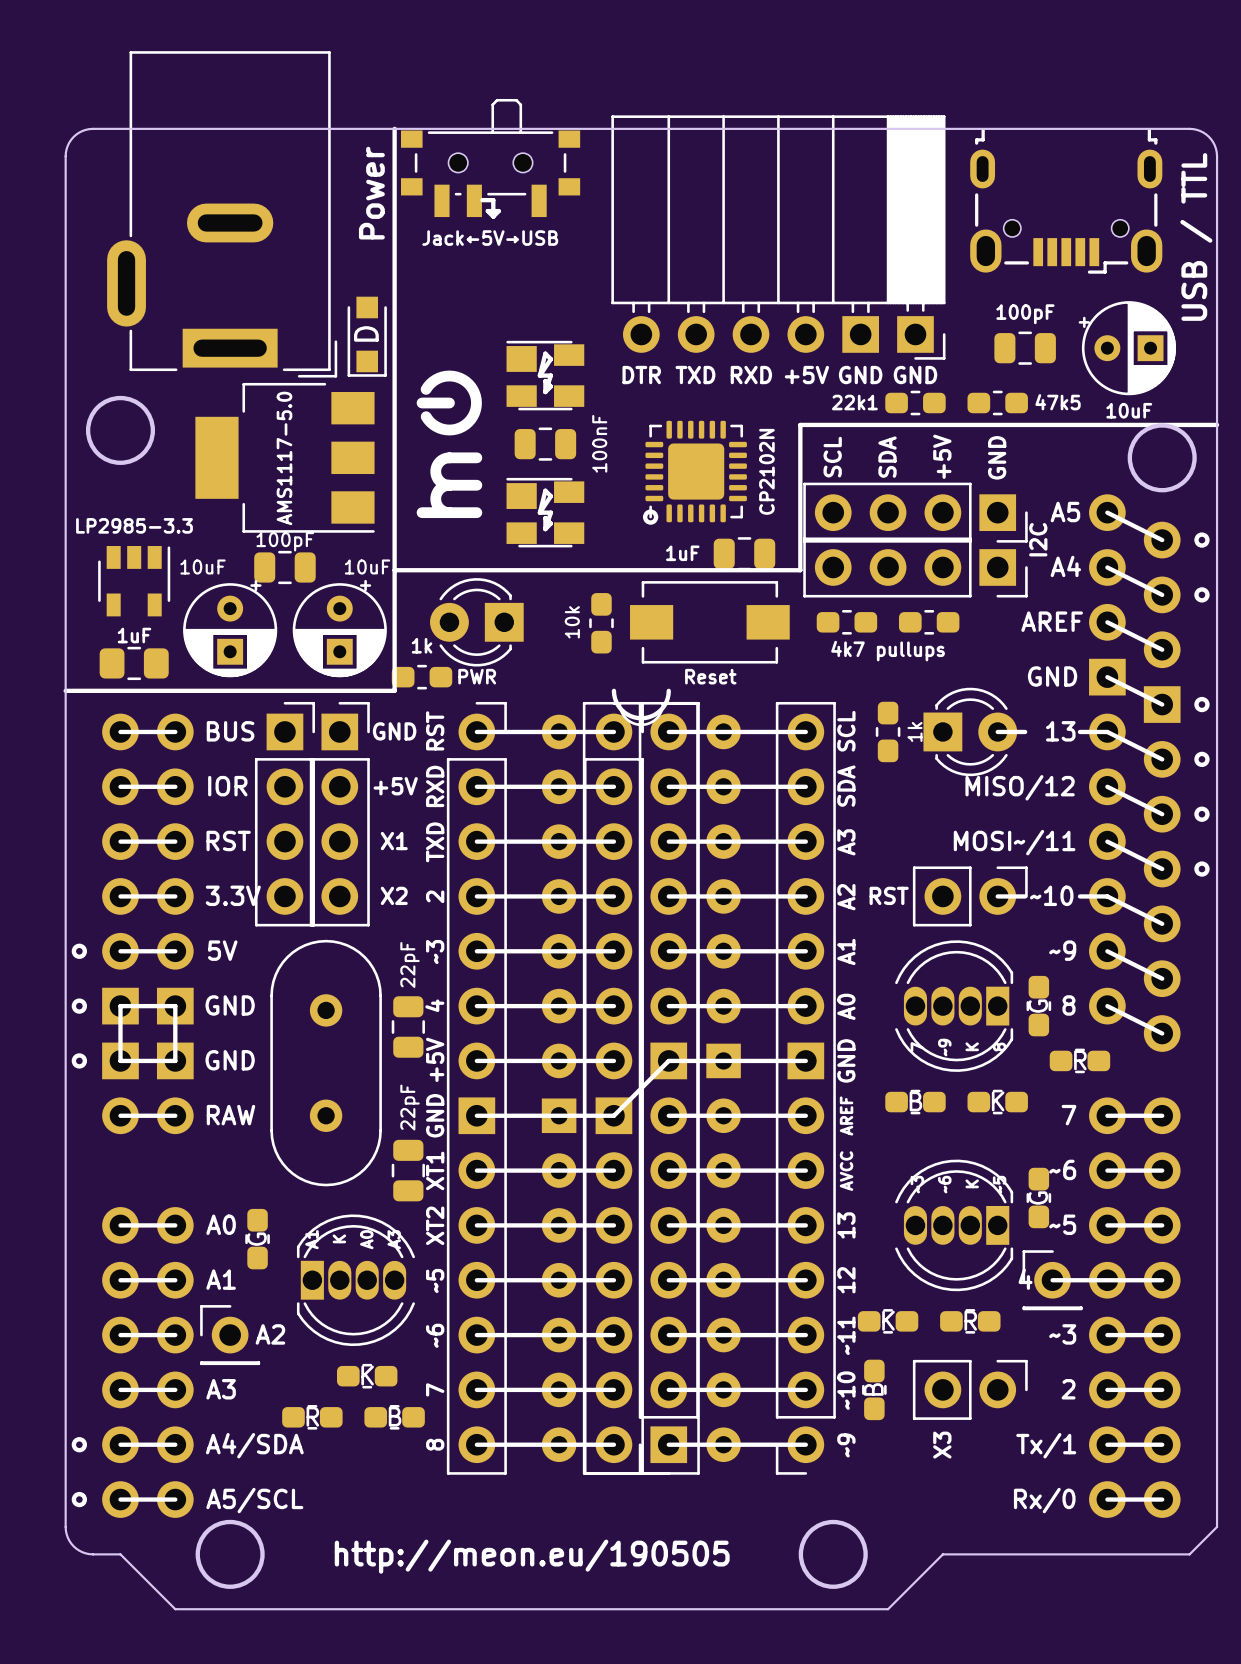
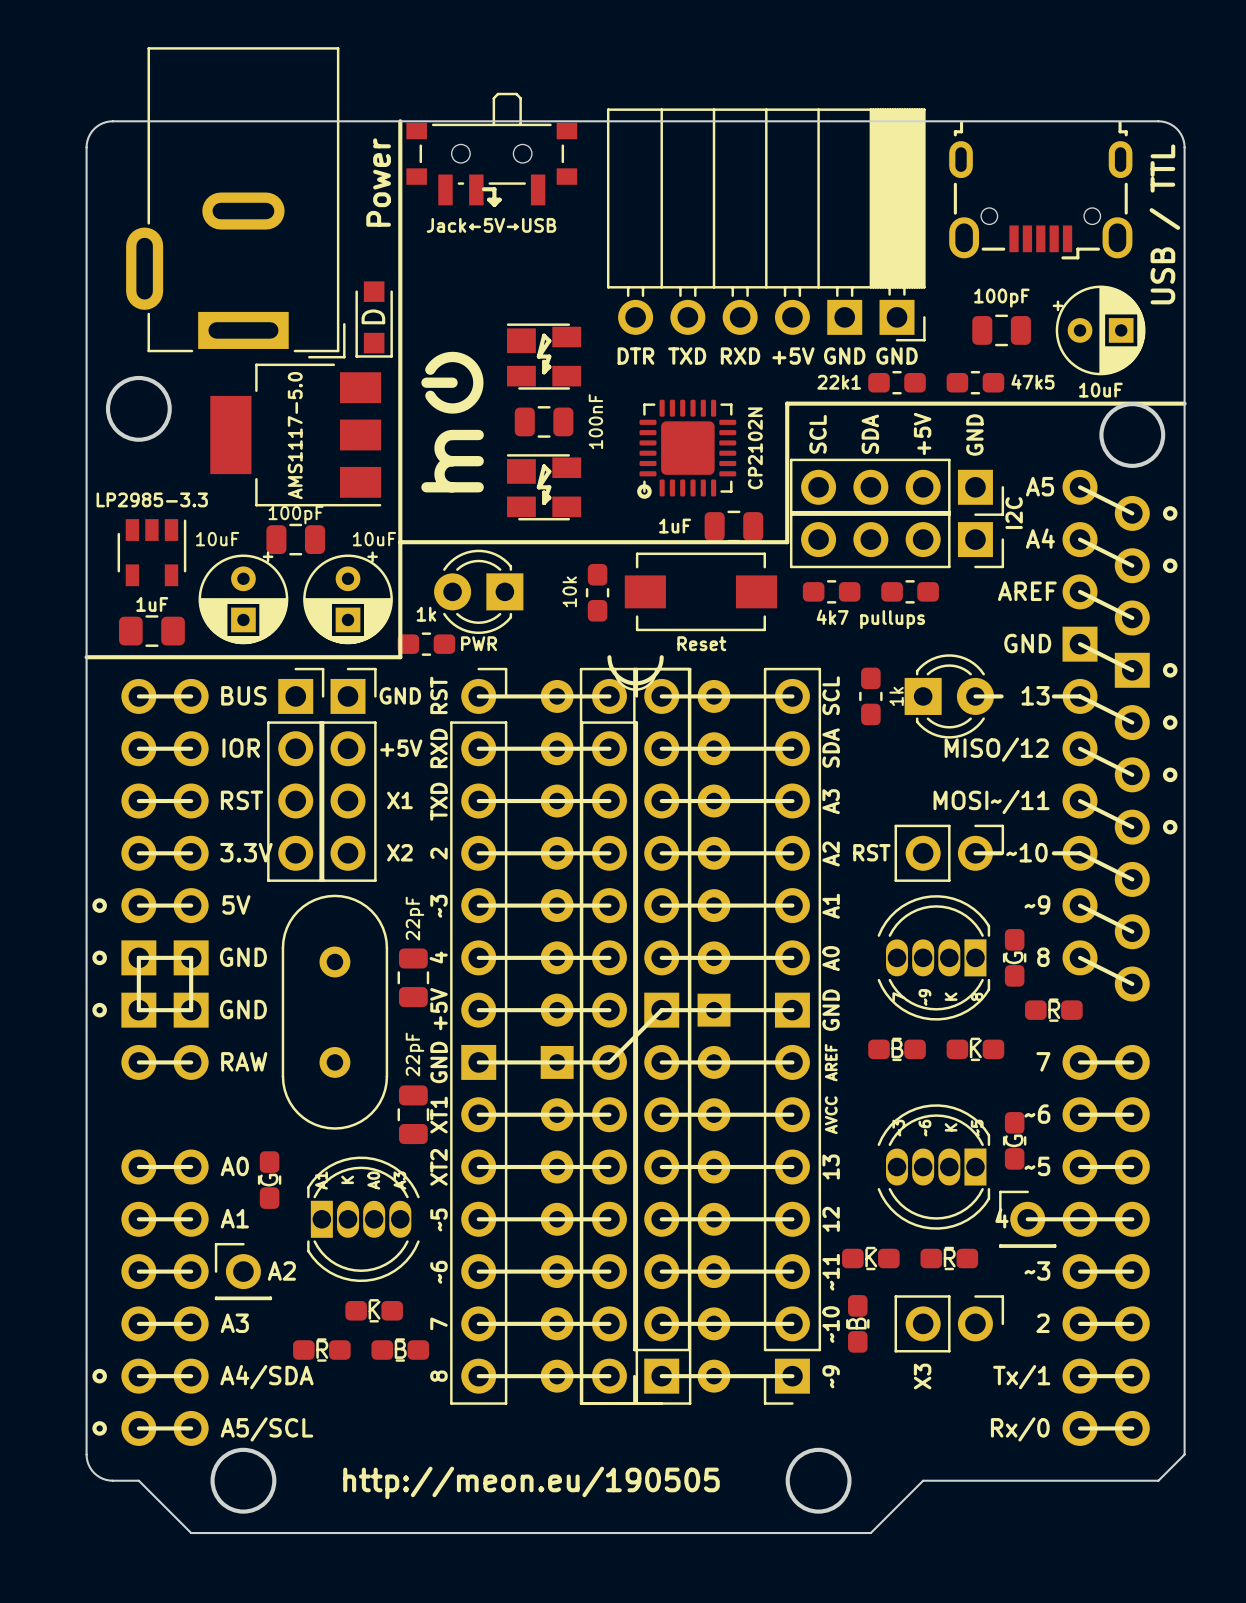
part footprint: [583, 701, 644, 1475] -> [580, 667, 639, 1405]
part footprint: [775, 701, 836, 1475] -> [763, 667, 822, 1405]

